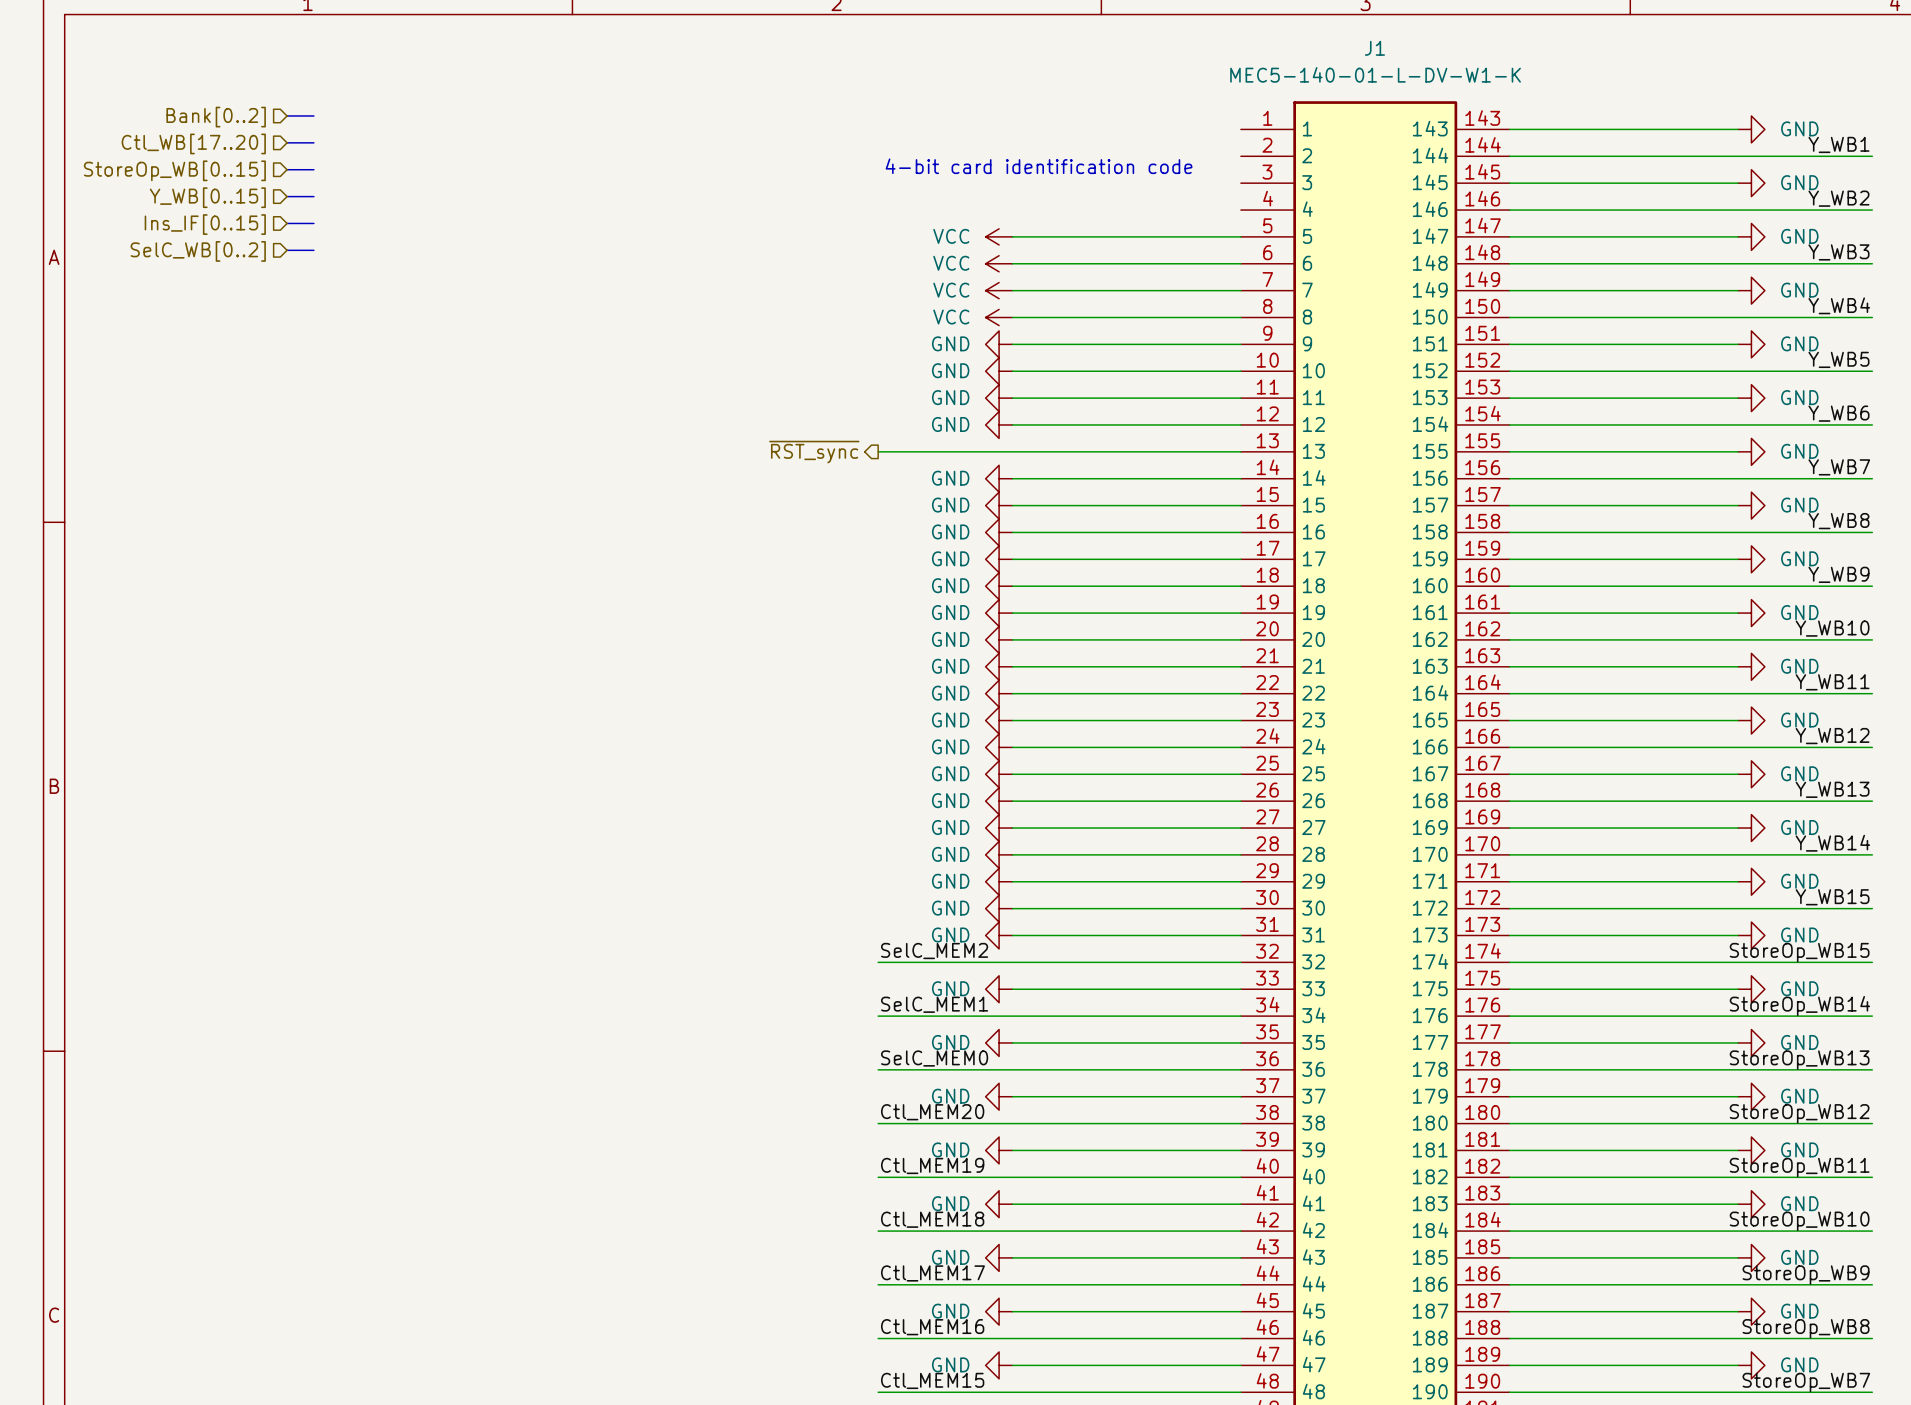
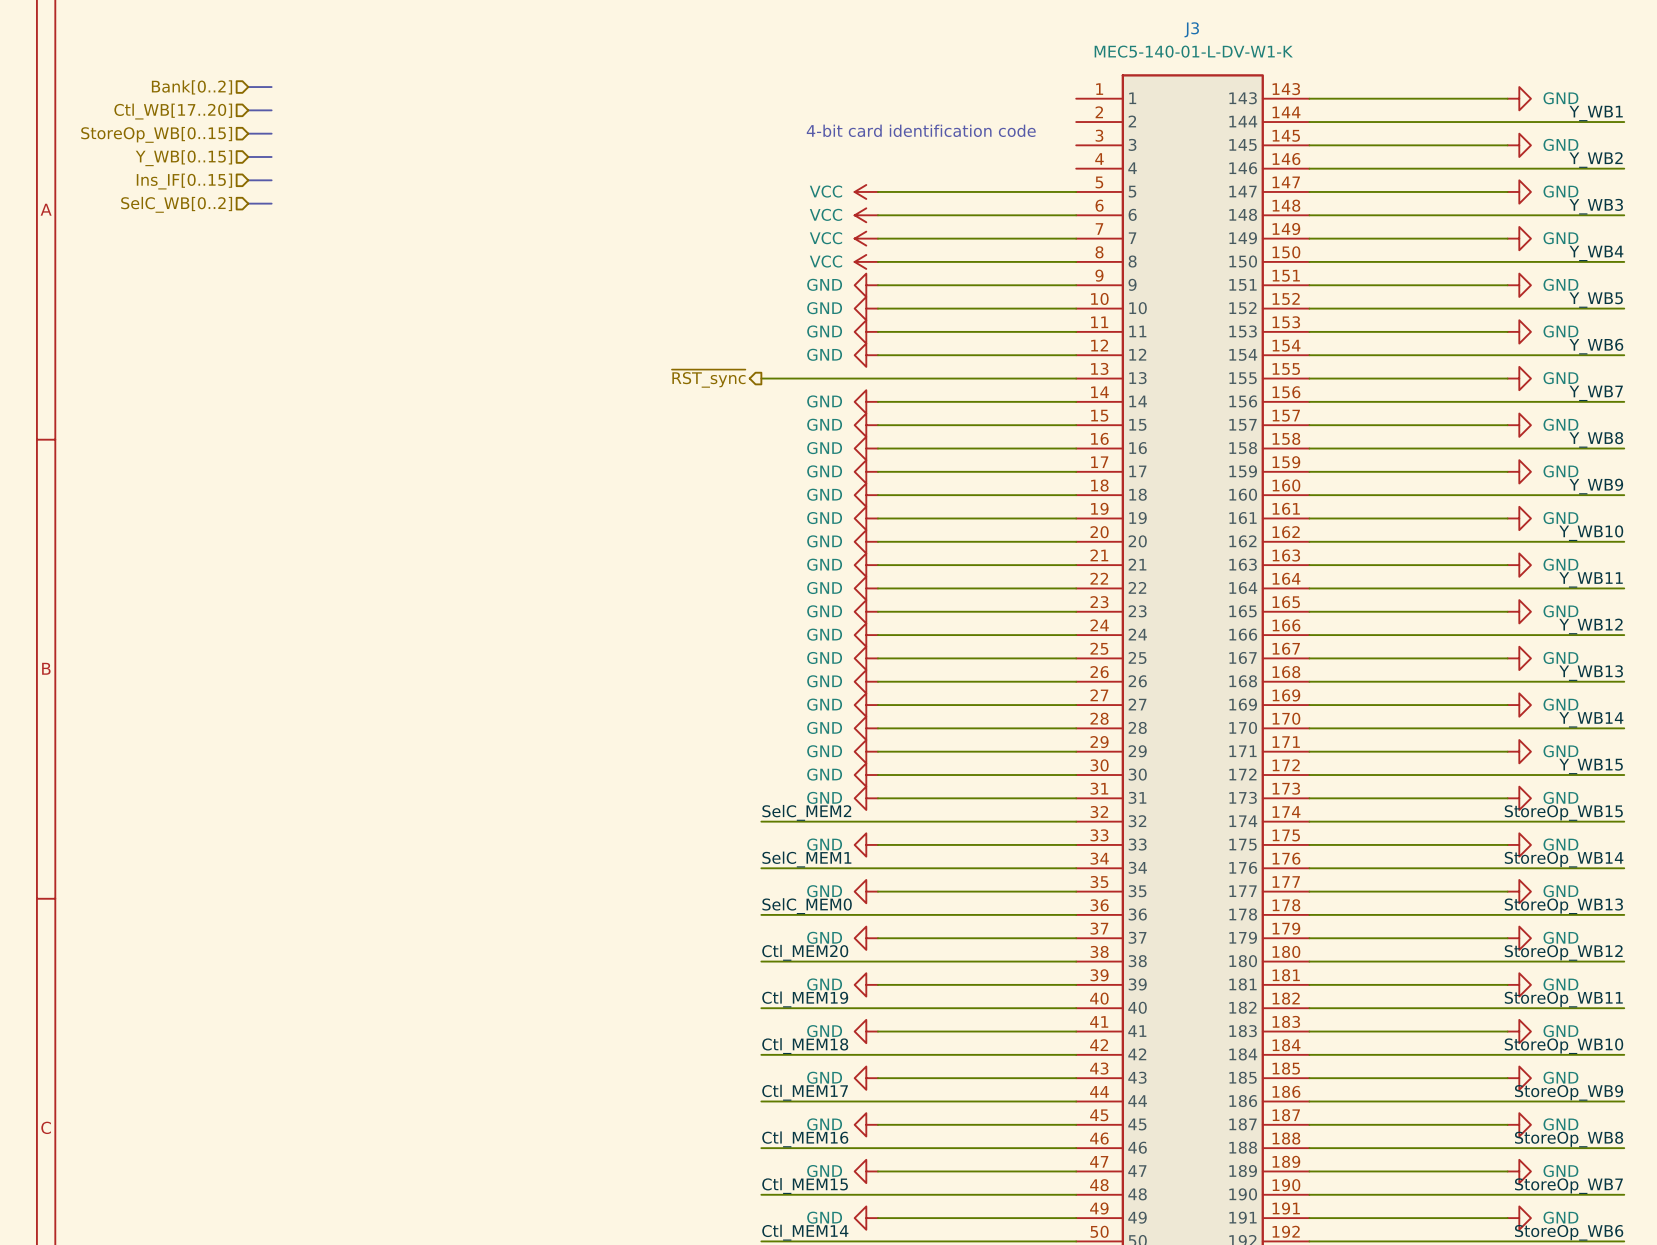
J1 name: J1 (1374, 48) -> J3 (1191, 29)

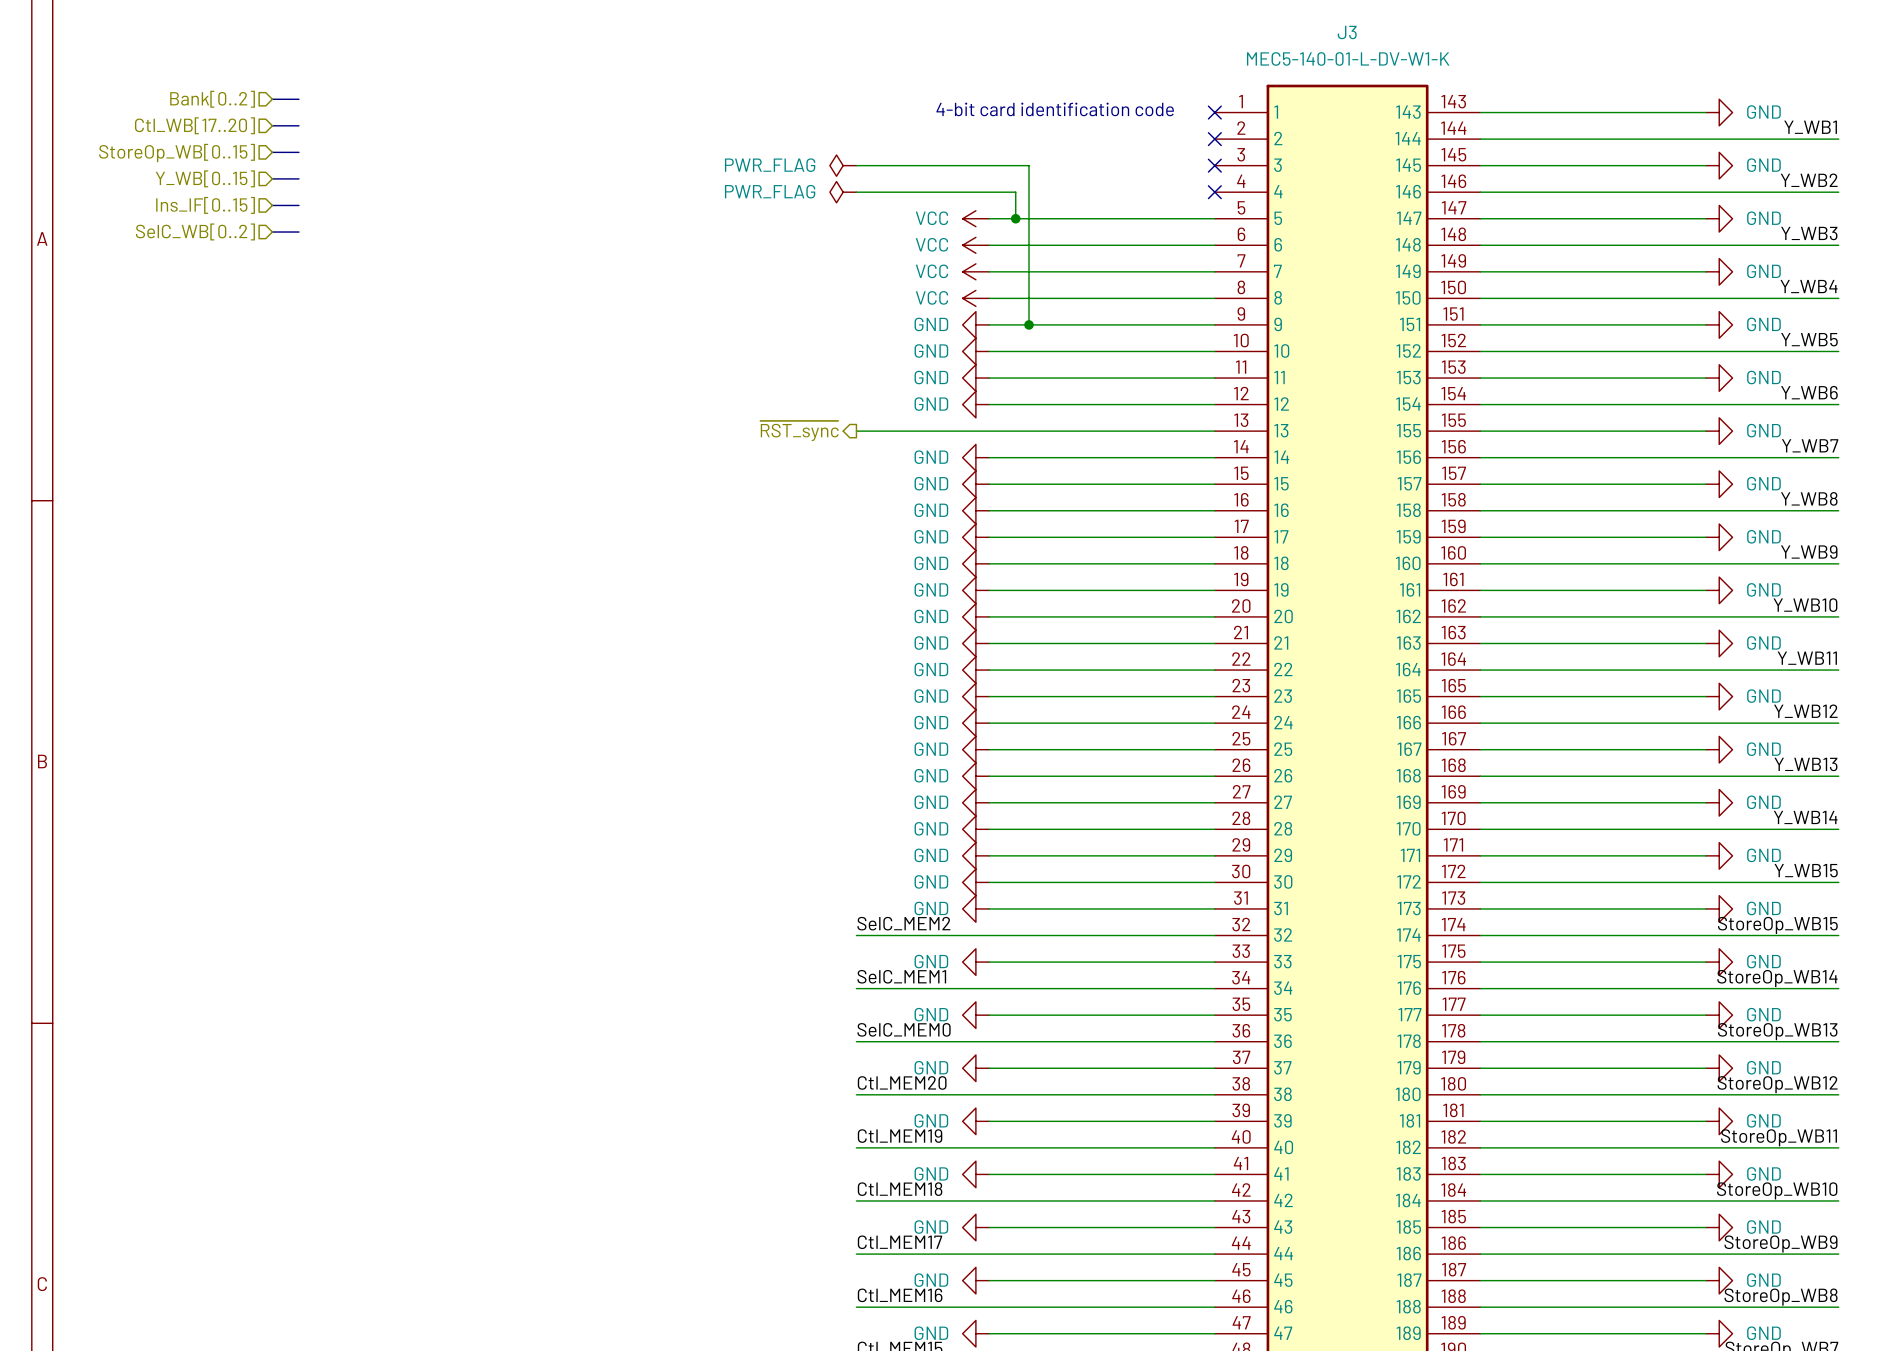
no-connect mark: none -> (1214, 112)
no-connect mark: none -> (1214, 139)
text position: 4-bit card identification code (921, 130) -> 4-bit card identification code (1055, 109)
power symbol: none -> PWR_FLAG (843, 165)
wire: none -> (856, 165) (1029, 165) (1029, 324)
no-connect mark: none -> (1214, 165)
power symbol: none -> PWR_FLAG (843, 192)
wire: none -> (856, 192) (1015, 192) (1015, 218)
no-connect mark: none -> (1214, 192)
junction: none -> (1015, 218)
junction: none -> (1029, 324)

